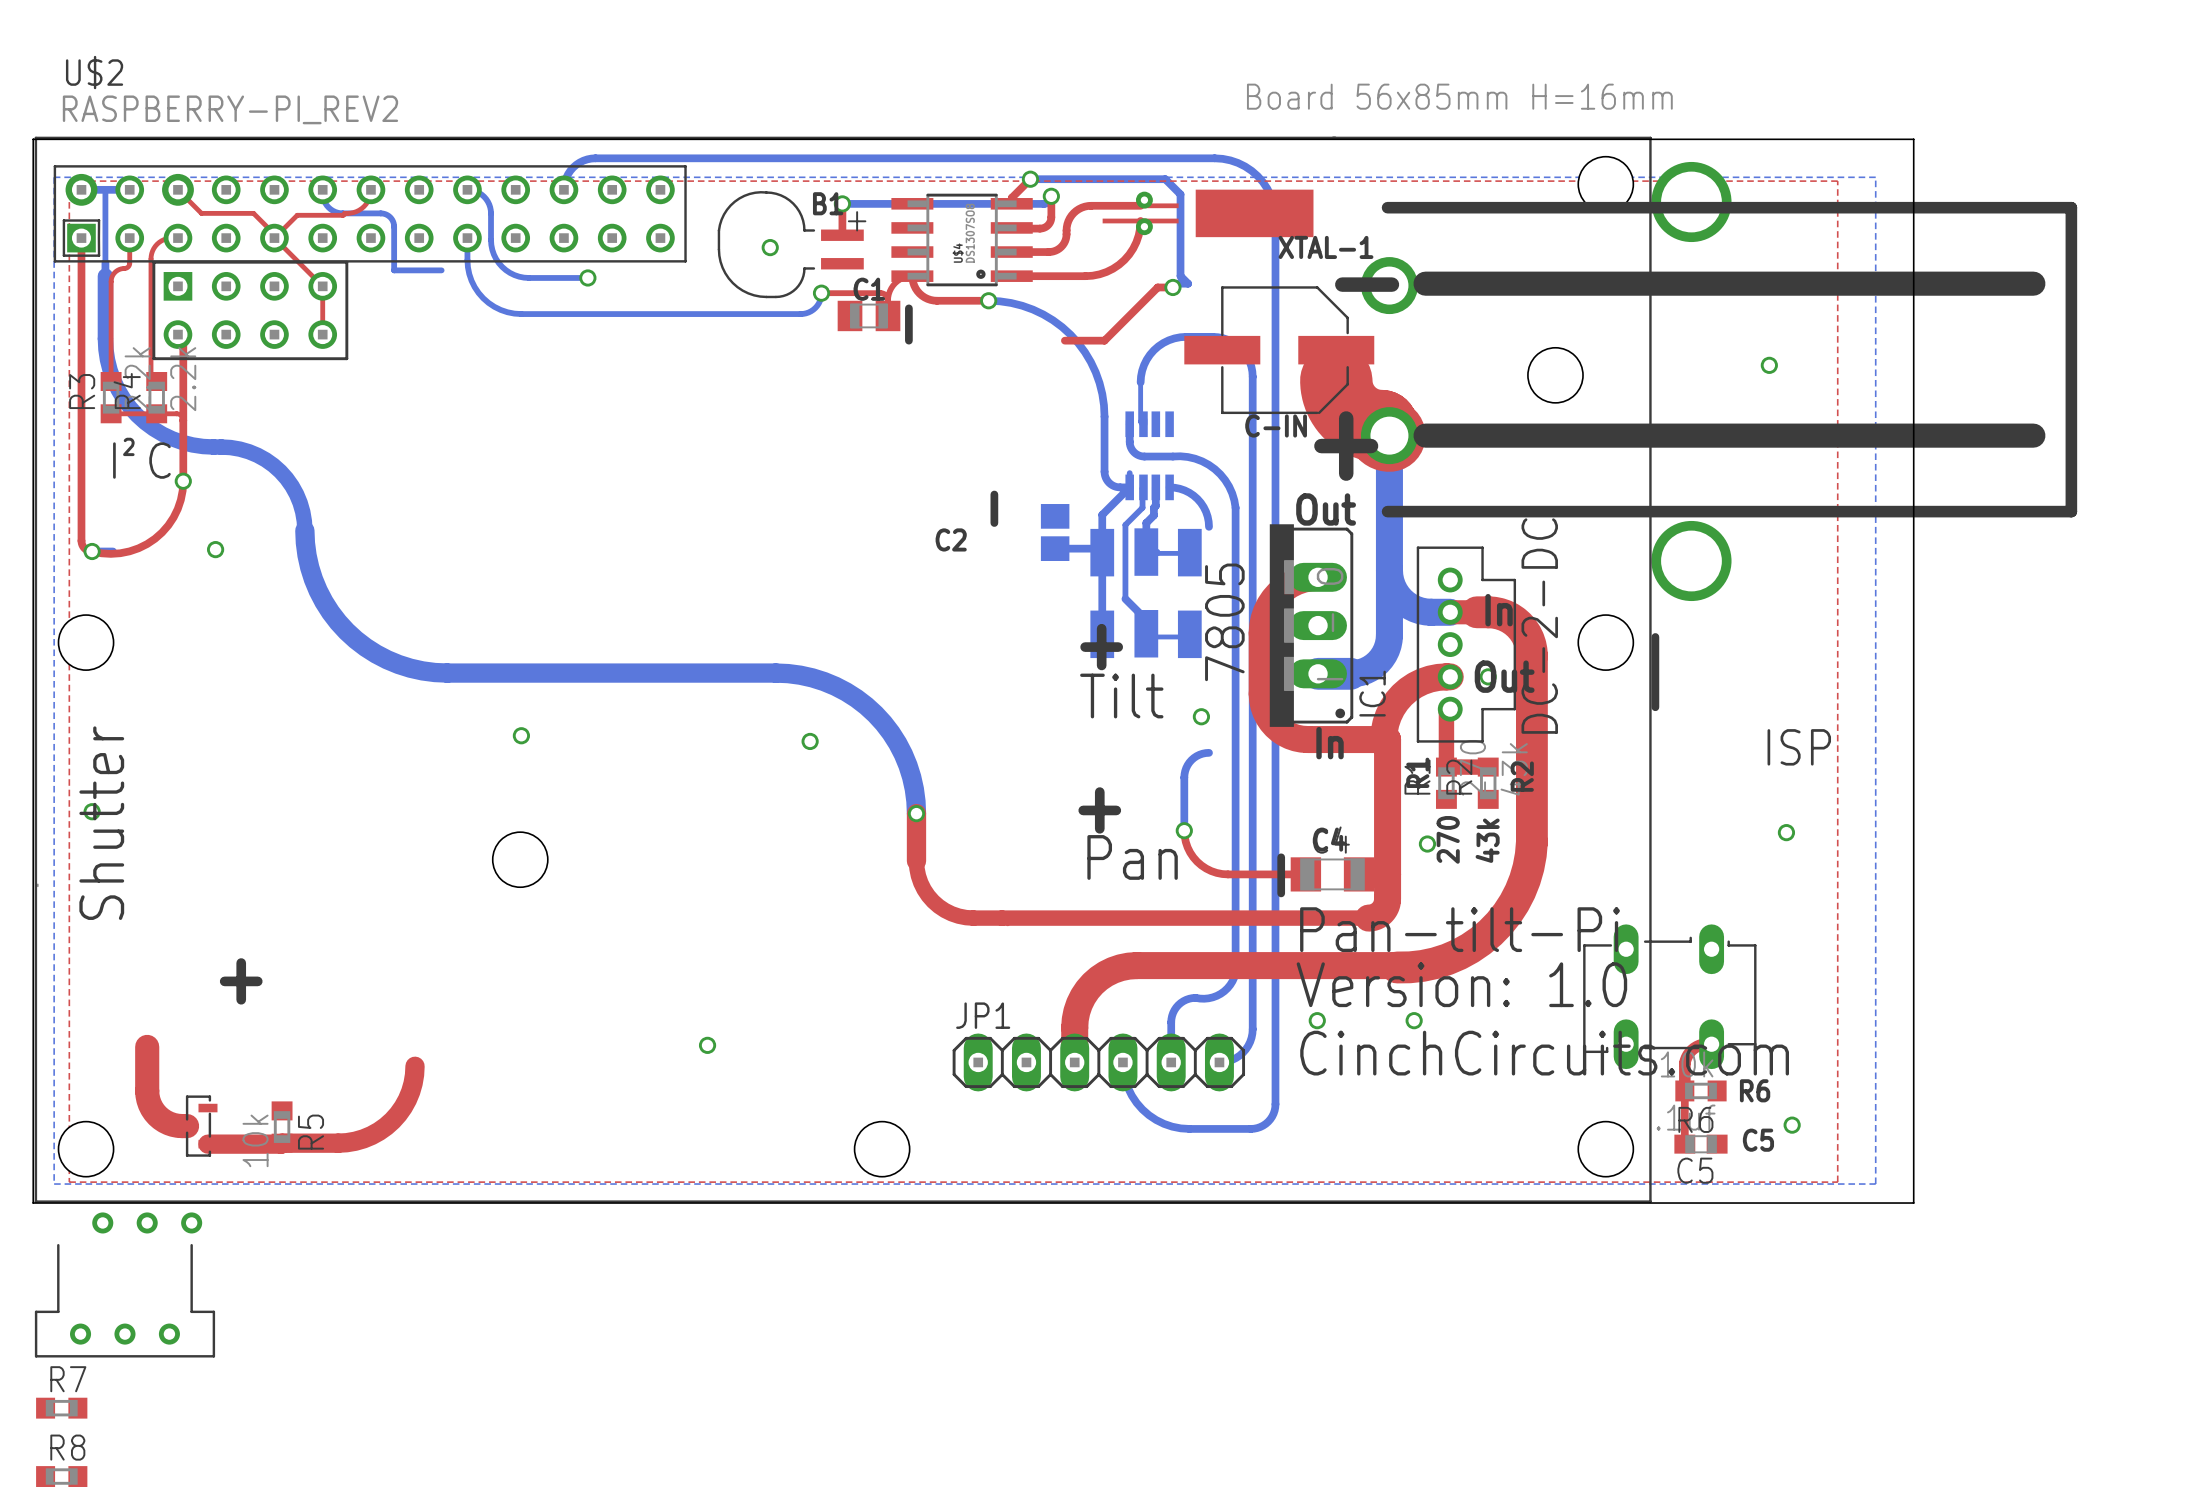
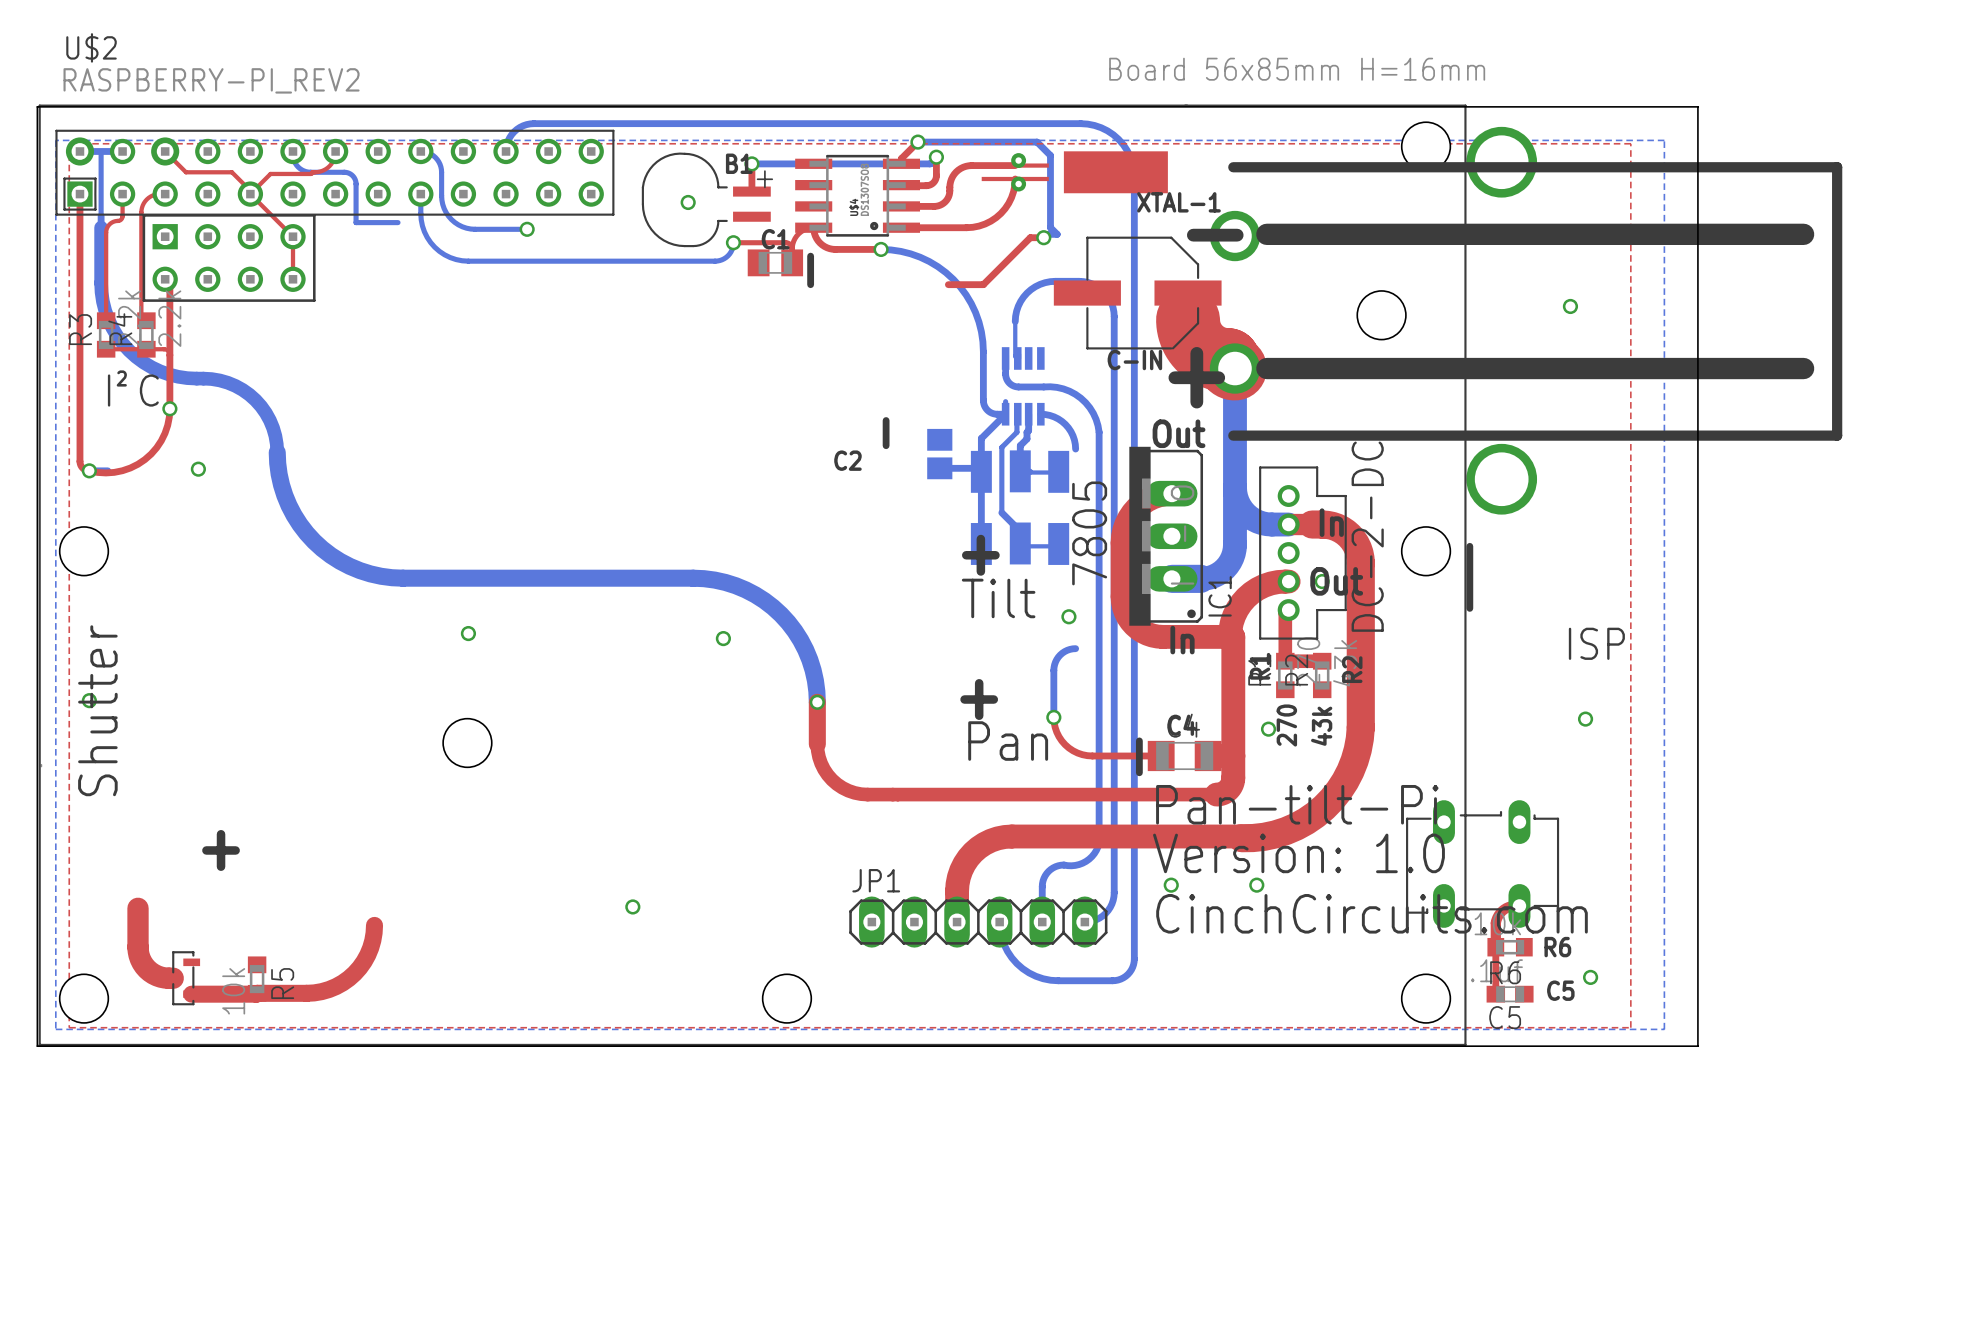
part: (124, 1284) -> none
R7: (61, 1408) -> none
R8: (61, 1476) -> none

